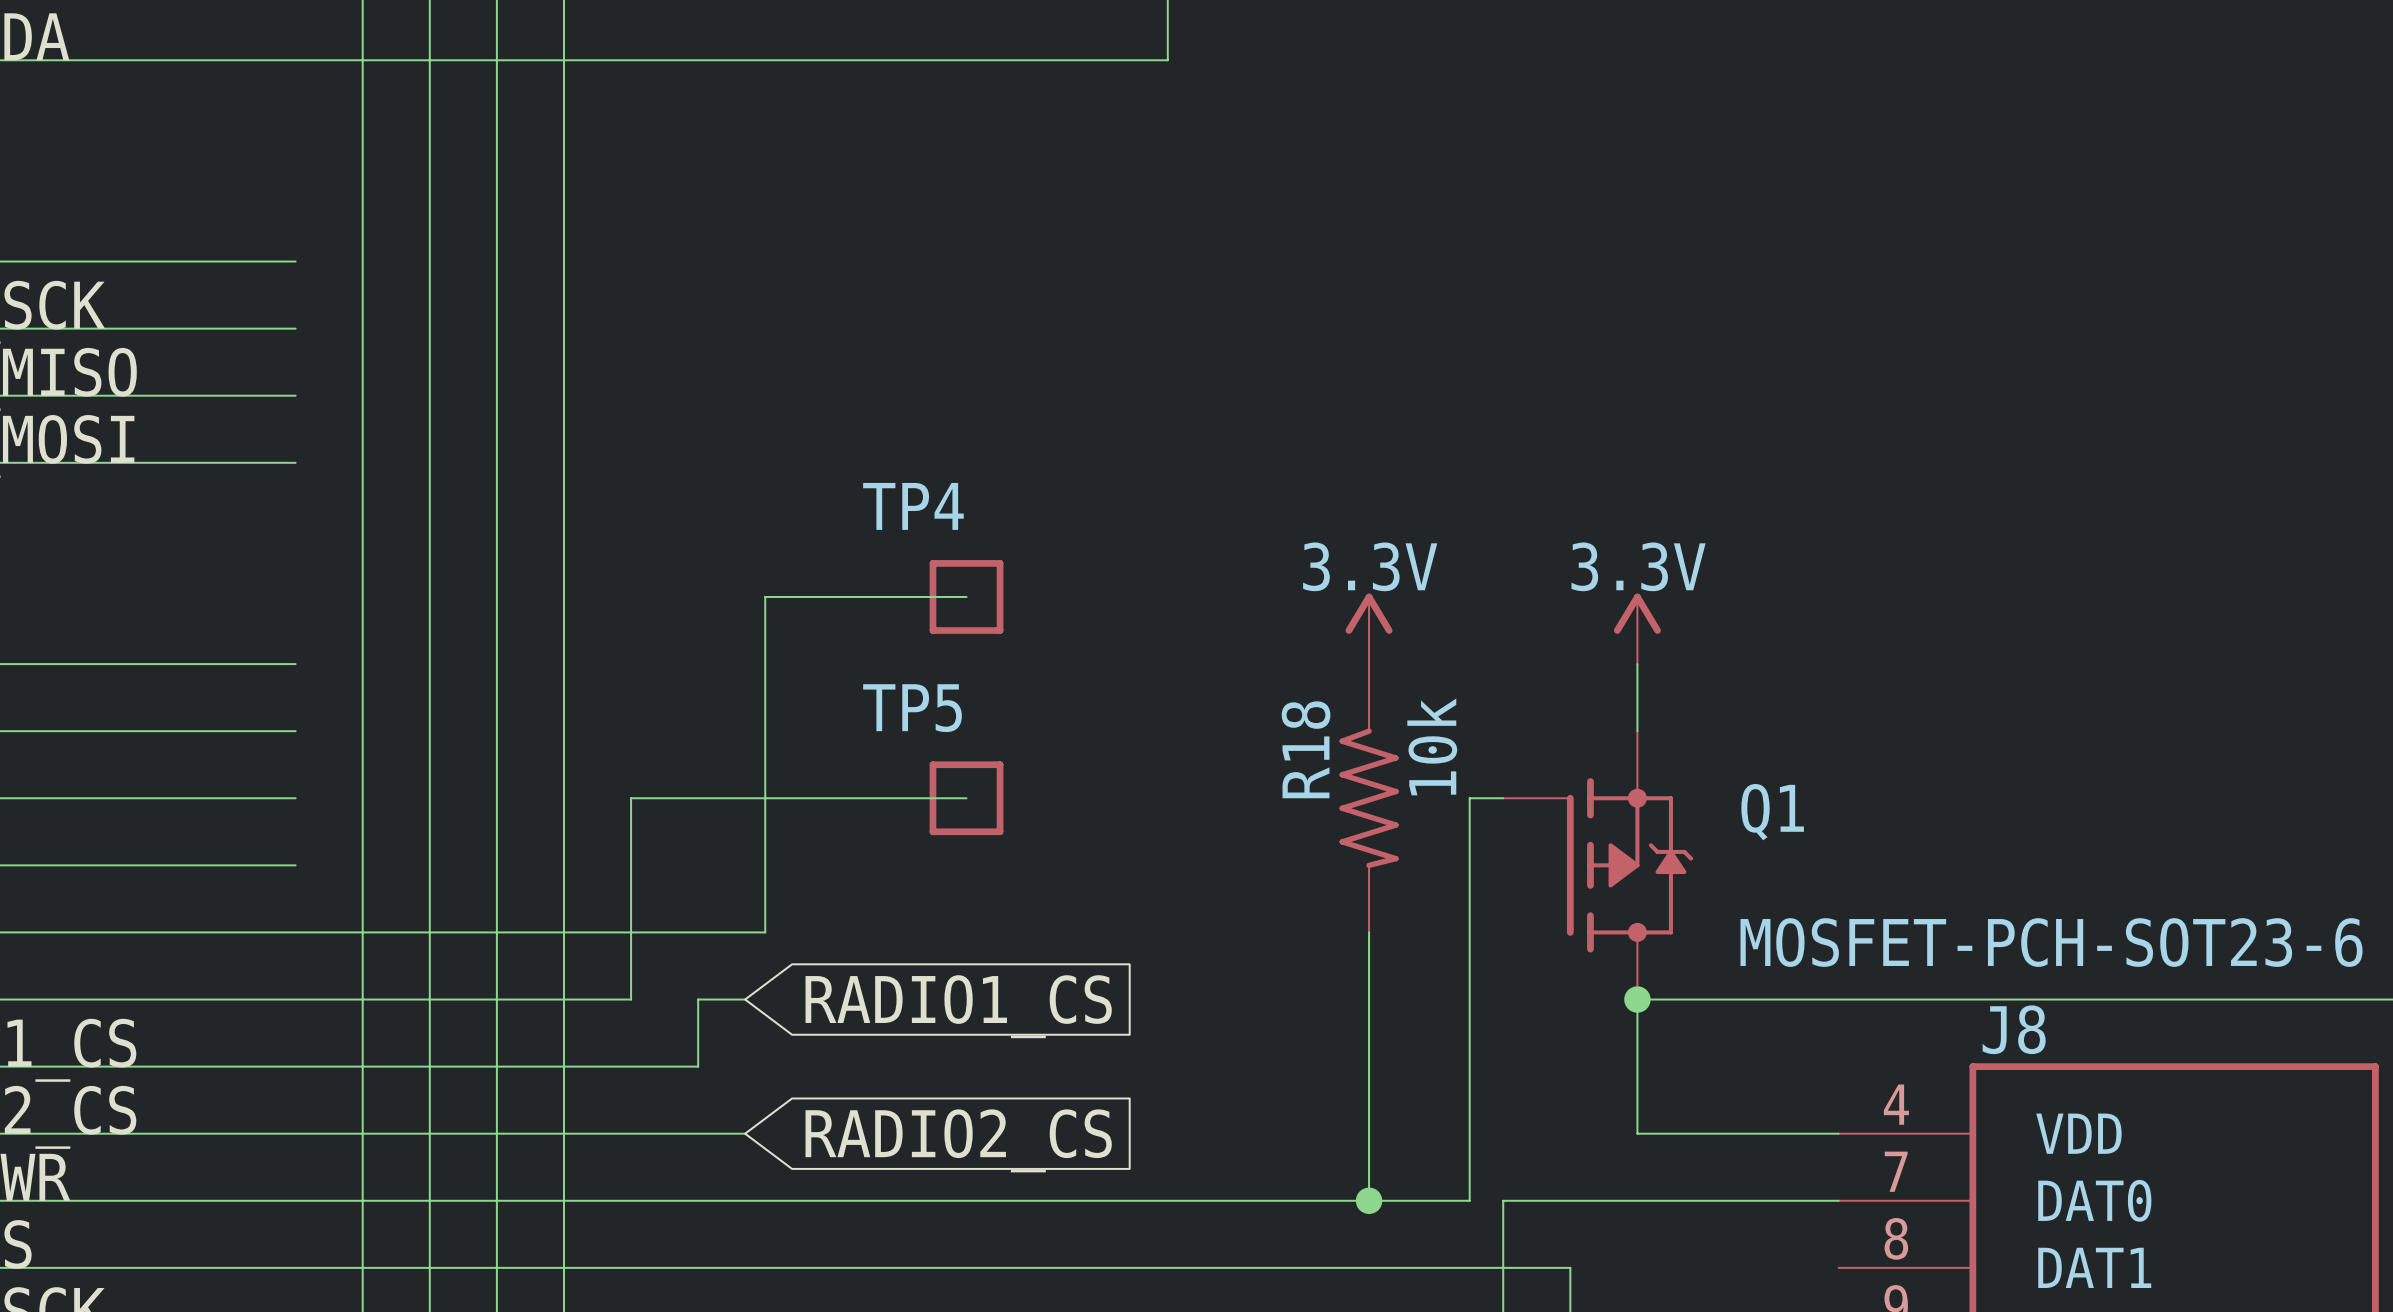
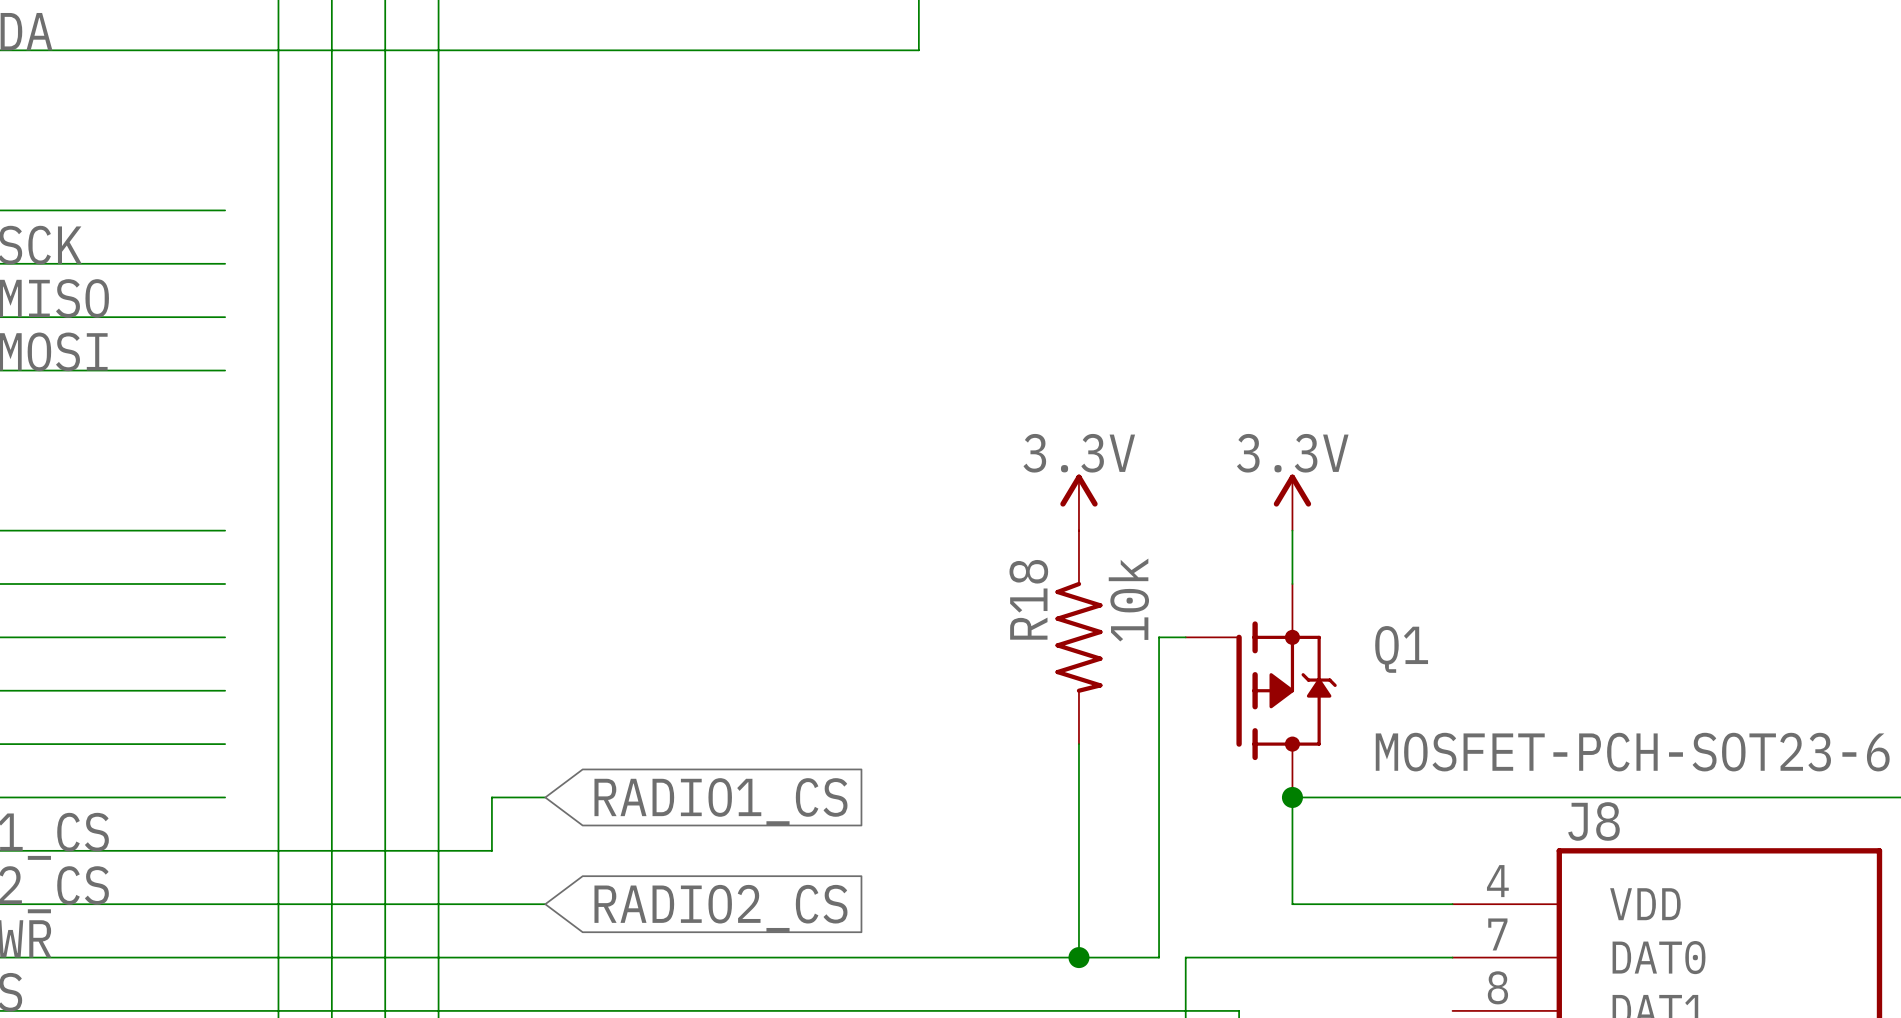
wire: (966, 596) (765, 596) (765, 932) (295, 932) -> none
TP4: (966, 596) -> none
wire: (966, 798) (631, 798) (631, 999) (295, 999) -> none
TP5: (966, 798) -> none
wire: (745, 999) (698, 999) (698, 1066) (631, 1066) -> (545, 797) (491, 797) (491, 850)
global label position: RADIO1_CS (958, 1006) -> RADIO1_CS (720, 801)
wire: (698, 1133) (745, 1133) -> none
global label position: RADIO2_CS (958, 1140) -> RADIO2_CS (720, 908)

